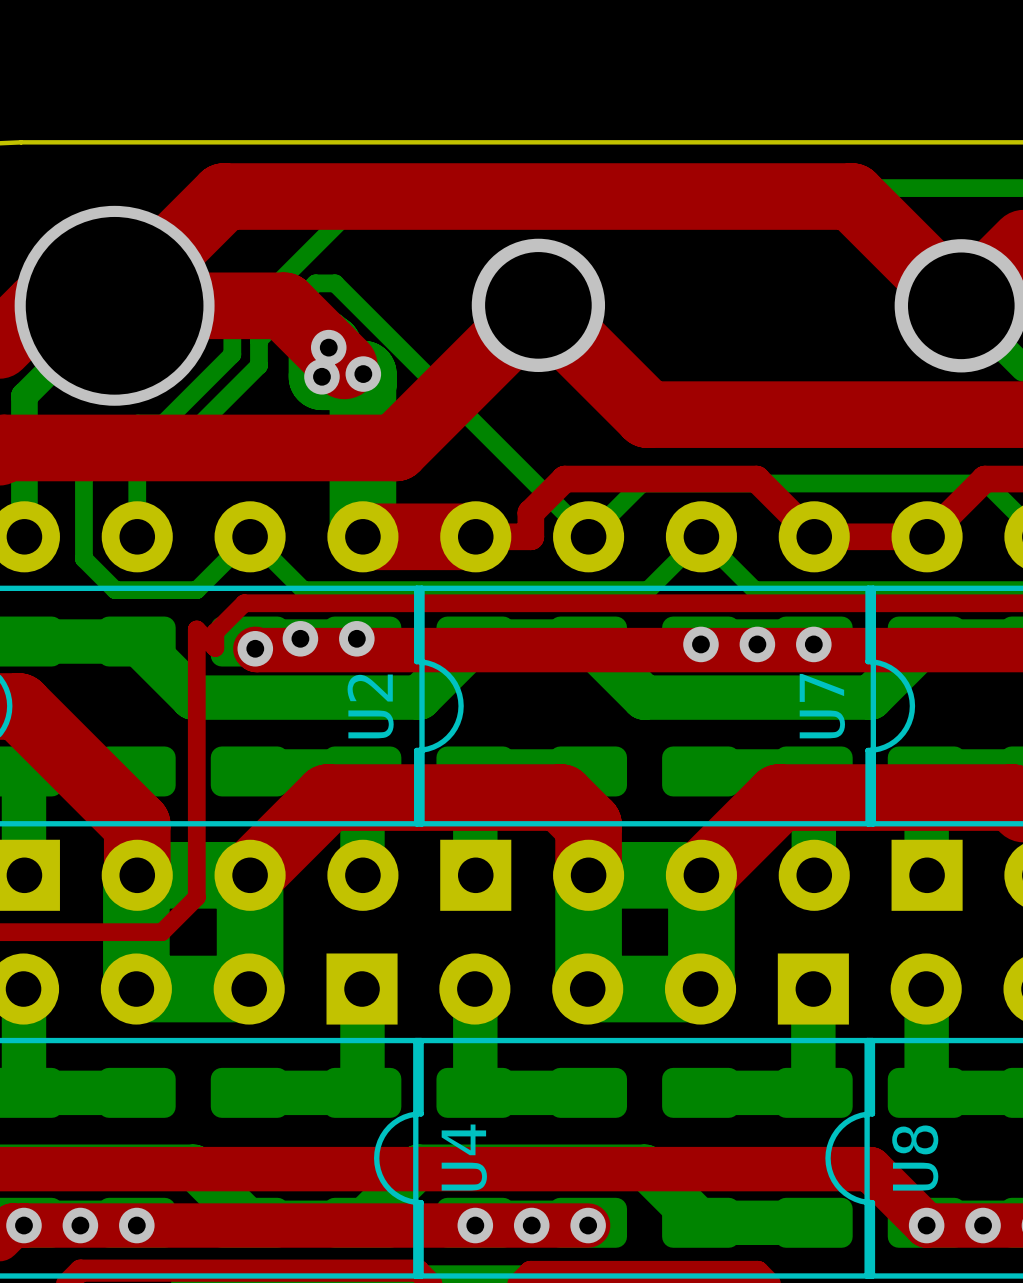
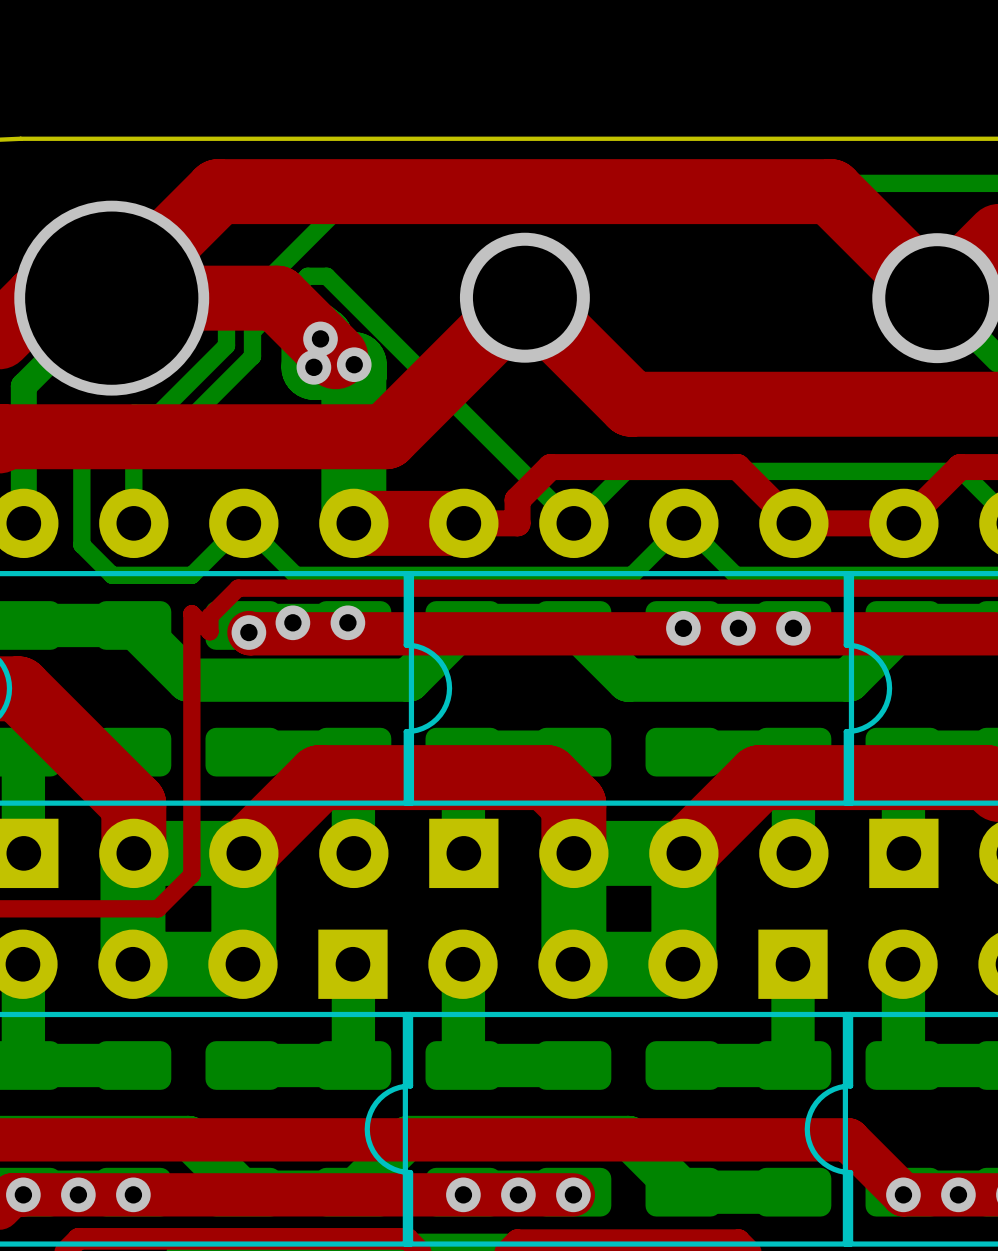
U2 name: U2 (370, 706) -> none
U7 name: U7 (822, 706) -> none
U4 name: U4 (464, 1157) -> none
U8 name: U8 (915, 1158) -> none

